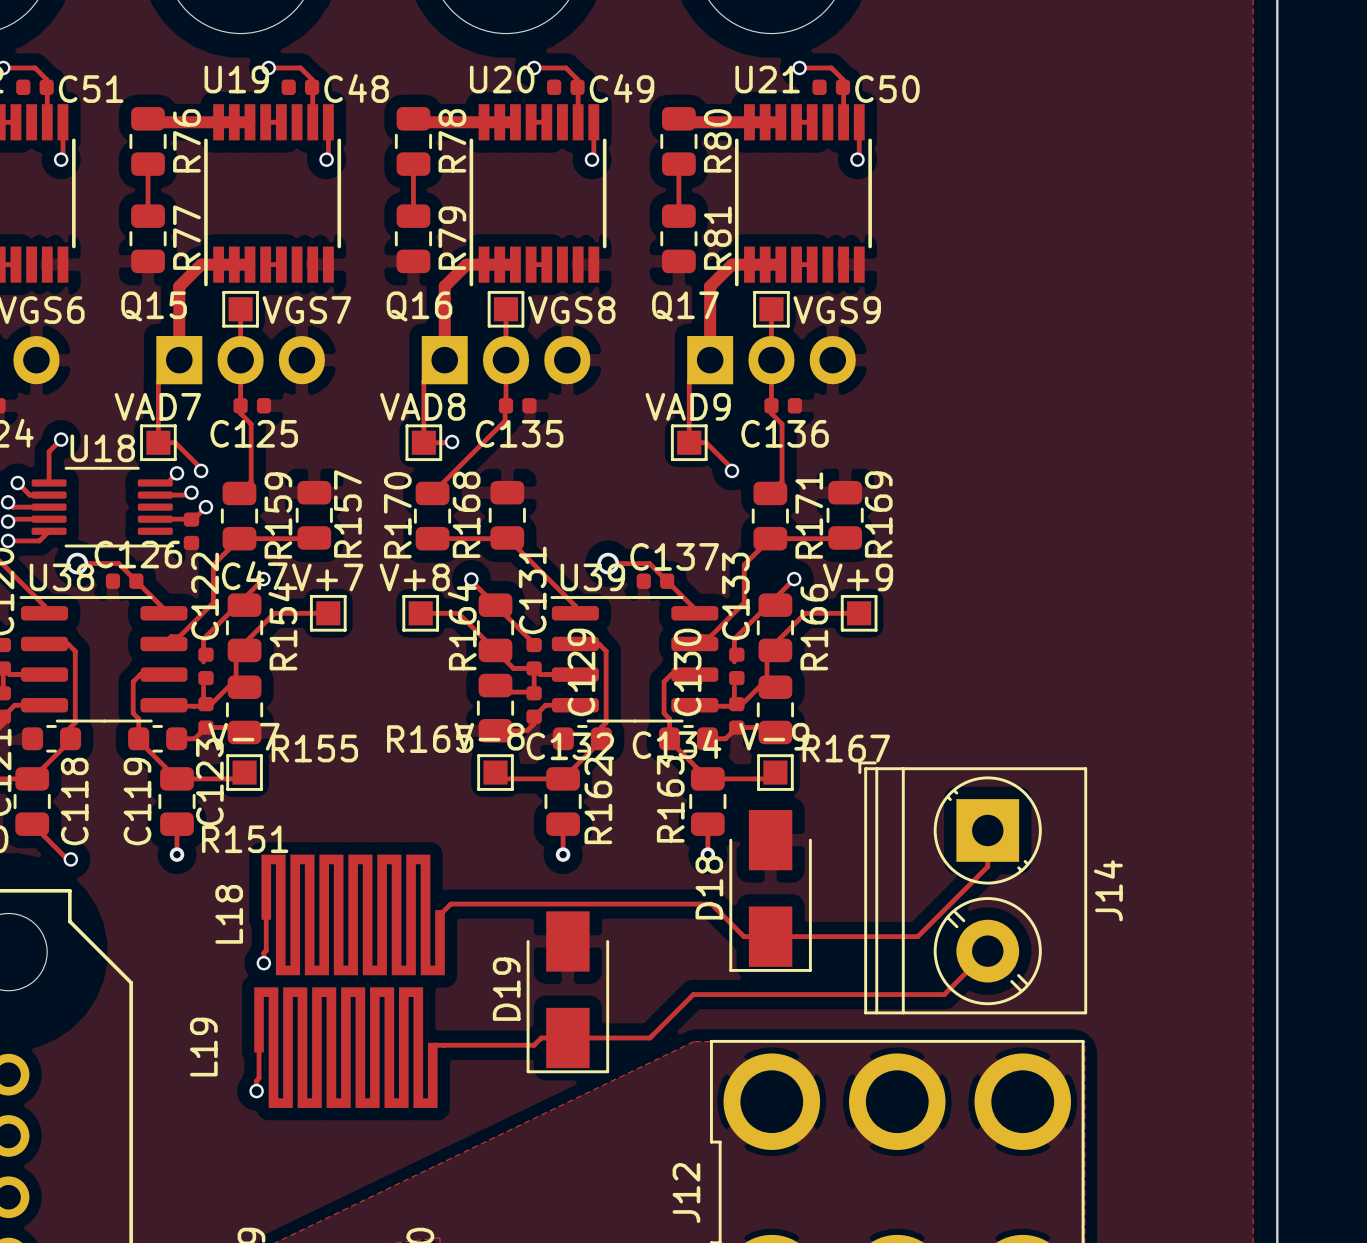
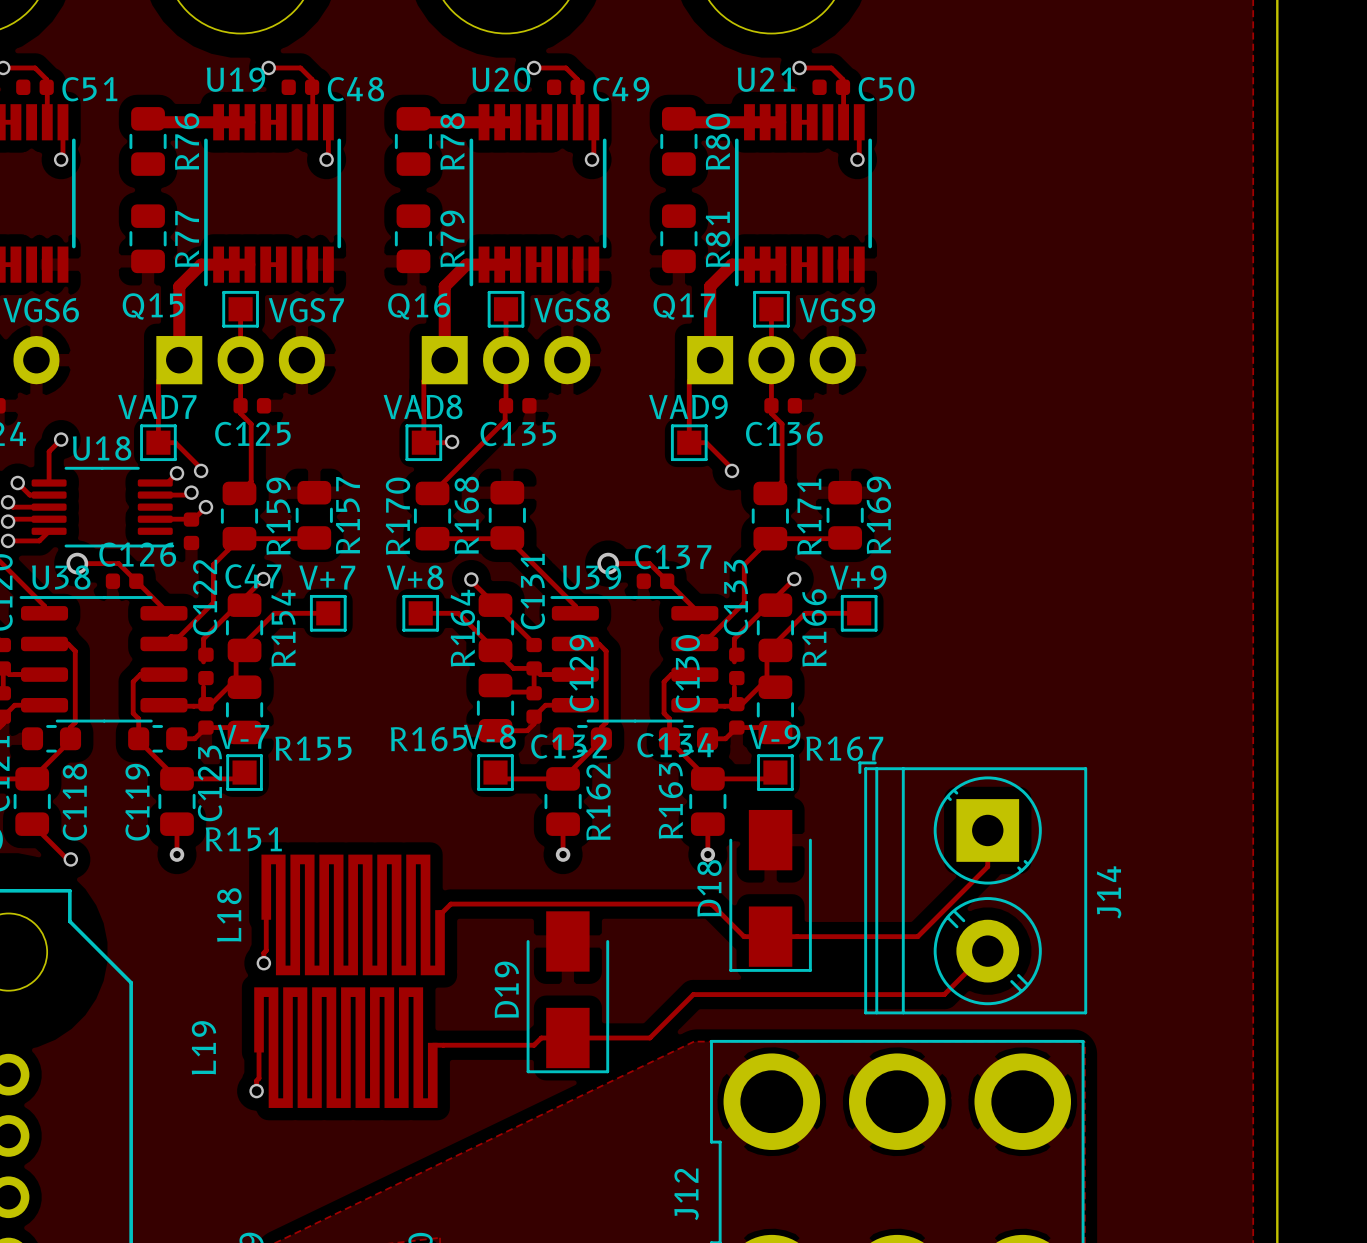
track: (148, 164) (148, 216) -> none
track: (413, 164) (413, 216) -> none
track: (678, 164) (678, 216) -> none

